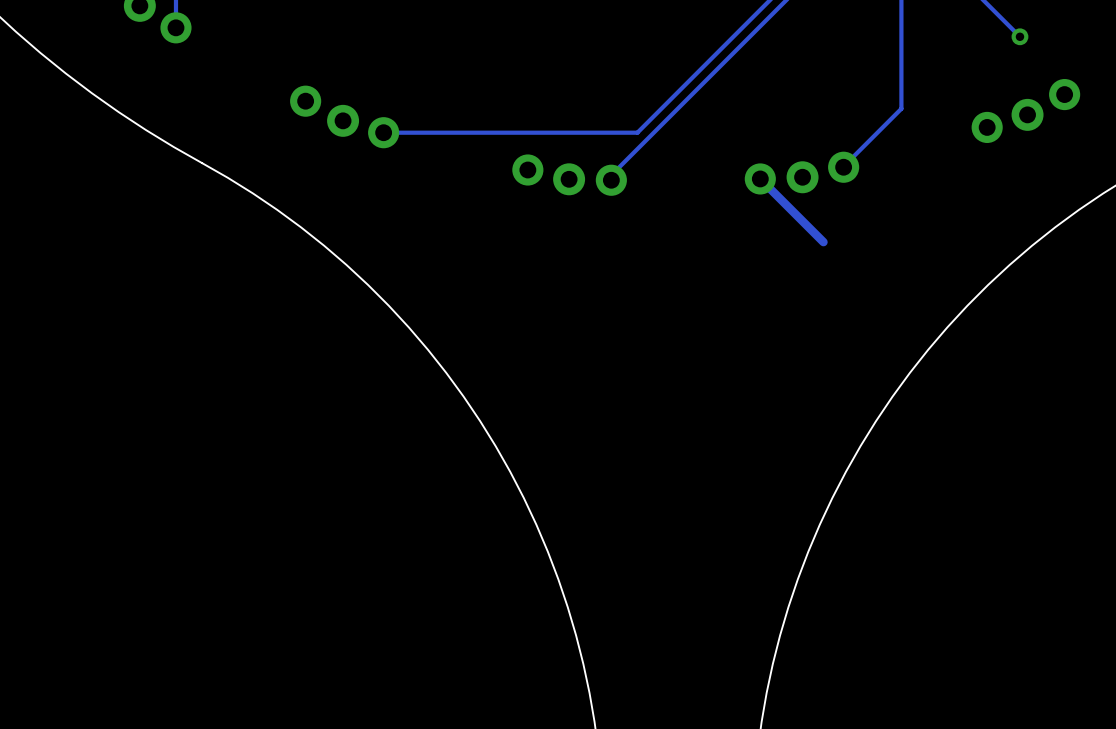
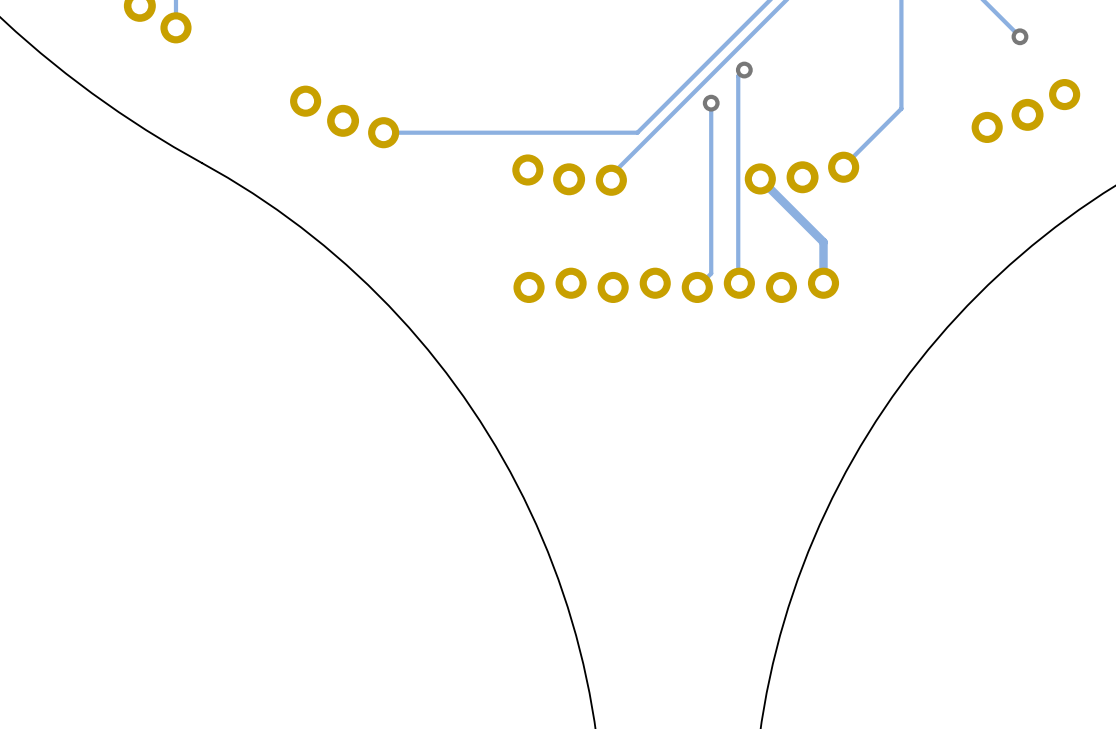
track: none -> (744, 70) (738, 76) (739, 283)
via: none -> (744, 70)
track: none -> (711, 103) (711, 273) (697, 287)
via: none -> (711, 103)
track: none -> (823, 242) (823, 283)
part: none -> (676, 285)

